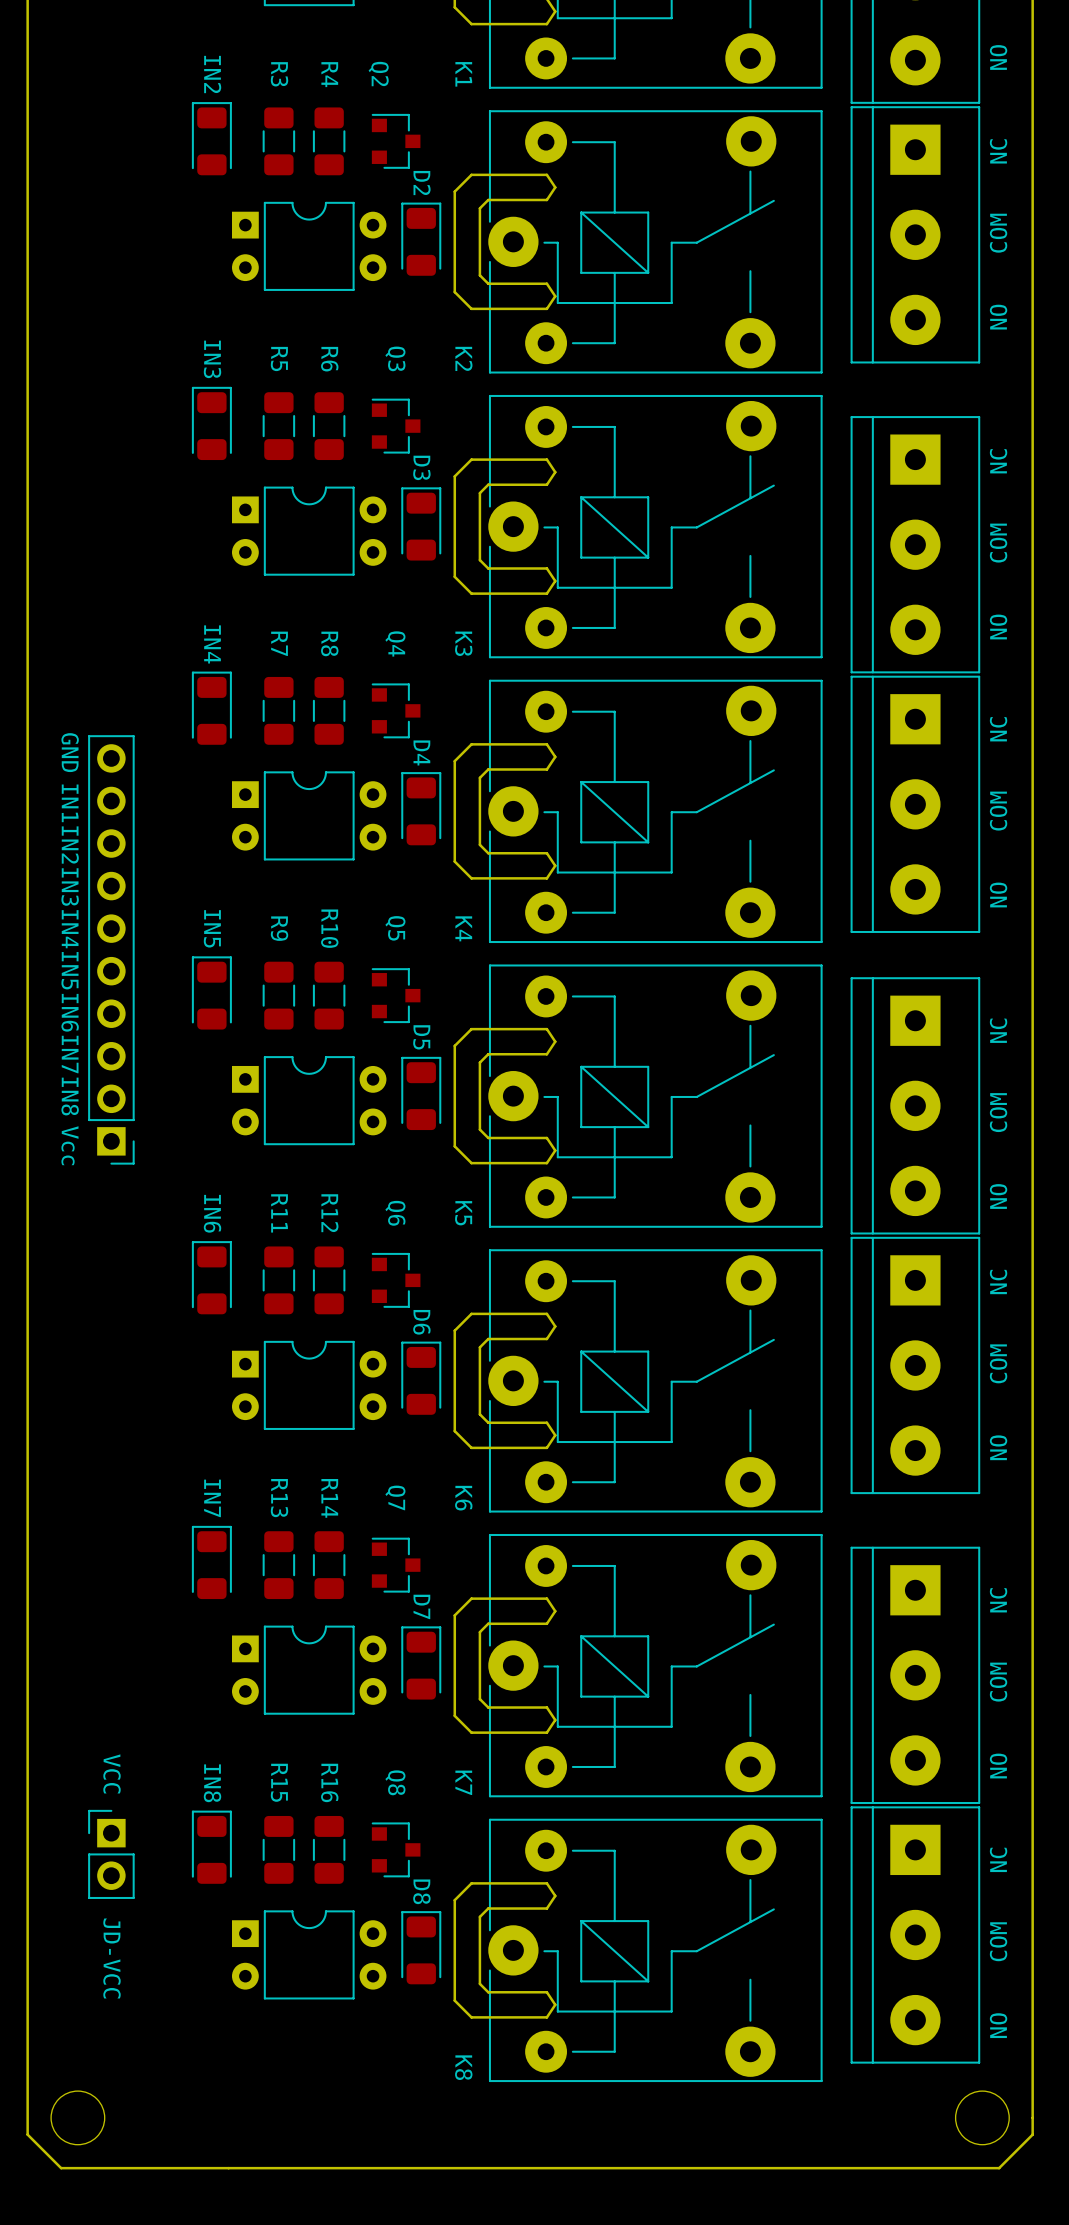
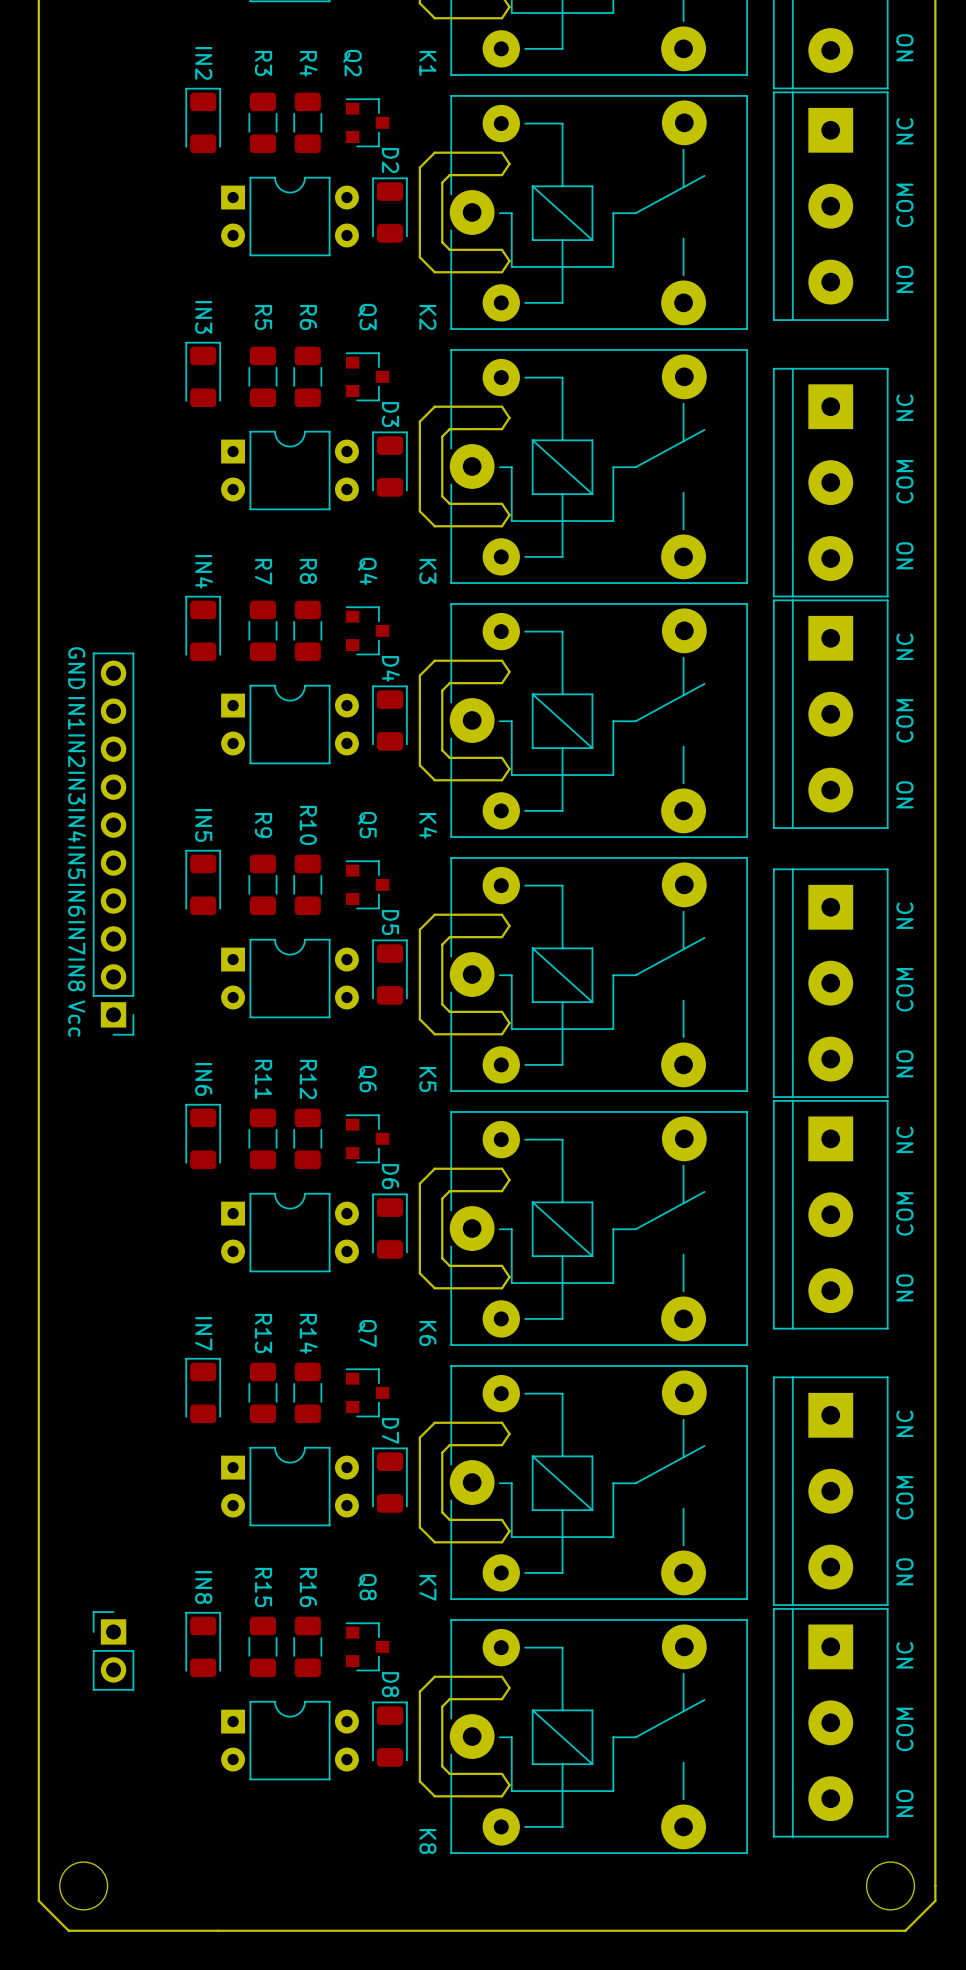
text: VCC (112, 1773) -> none
text: JD-VCC (112, 1958) -> none

